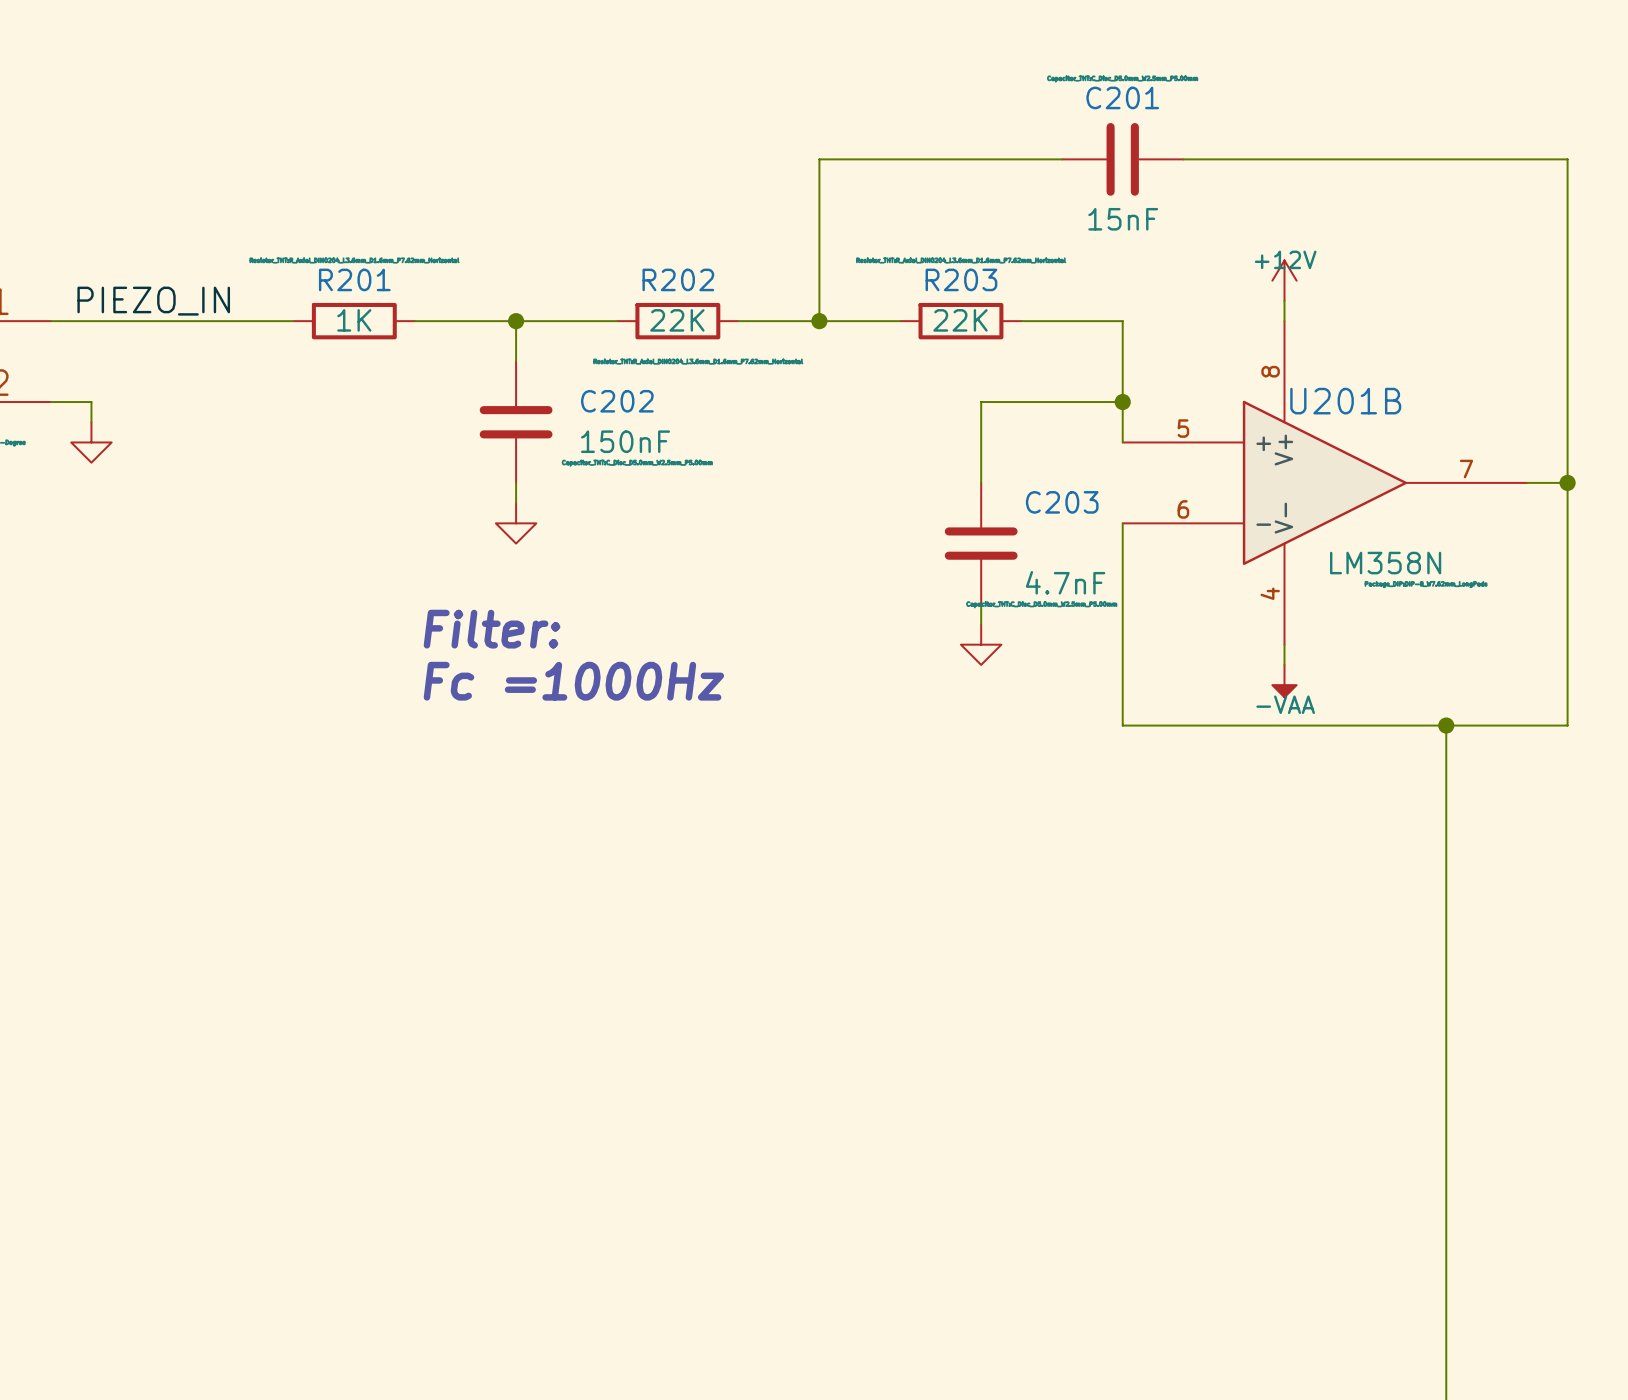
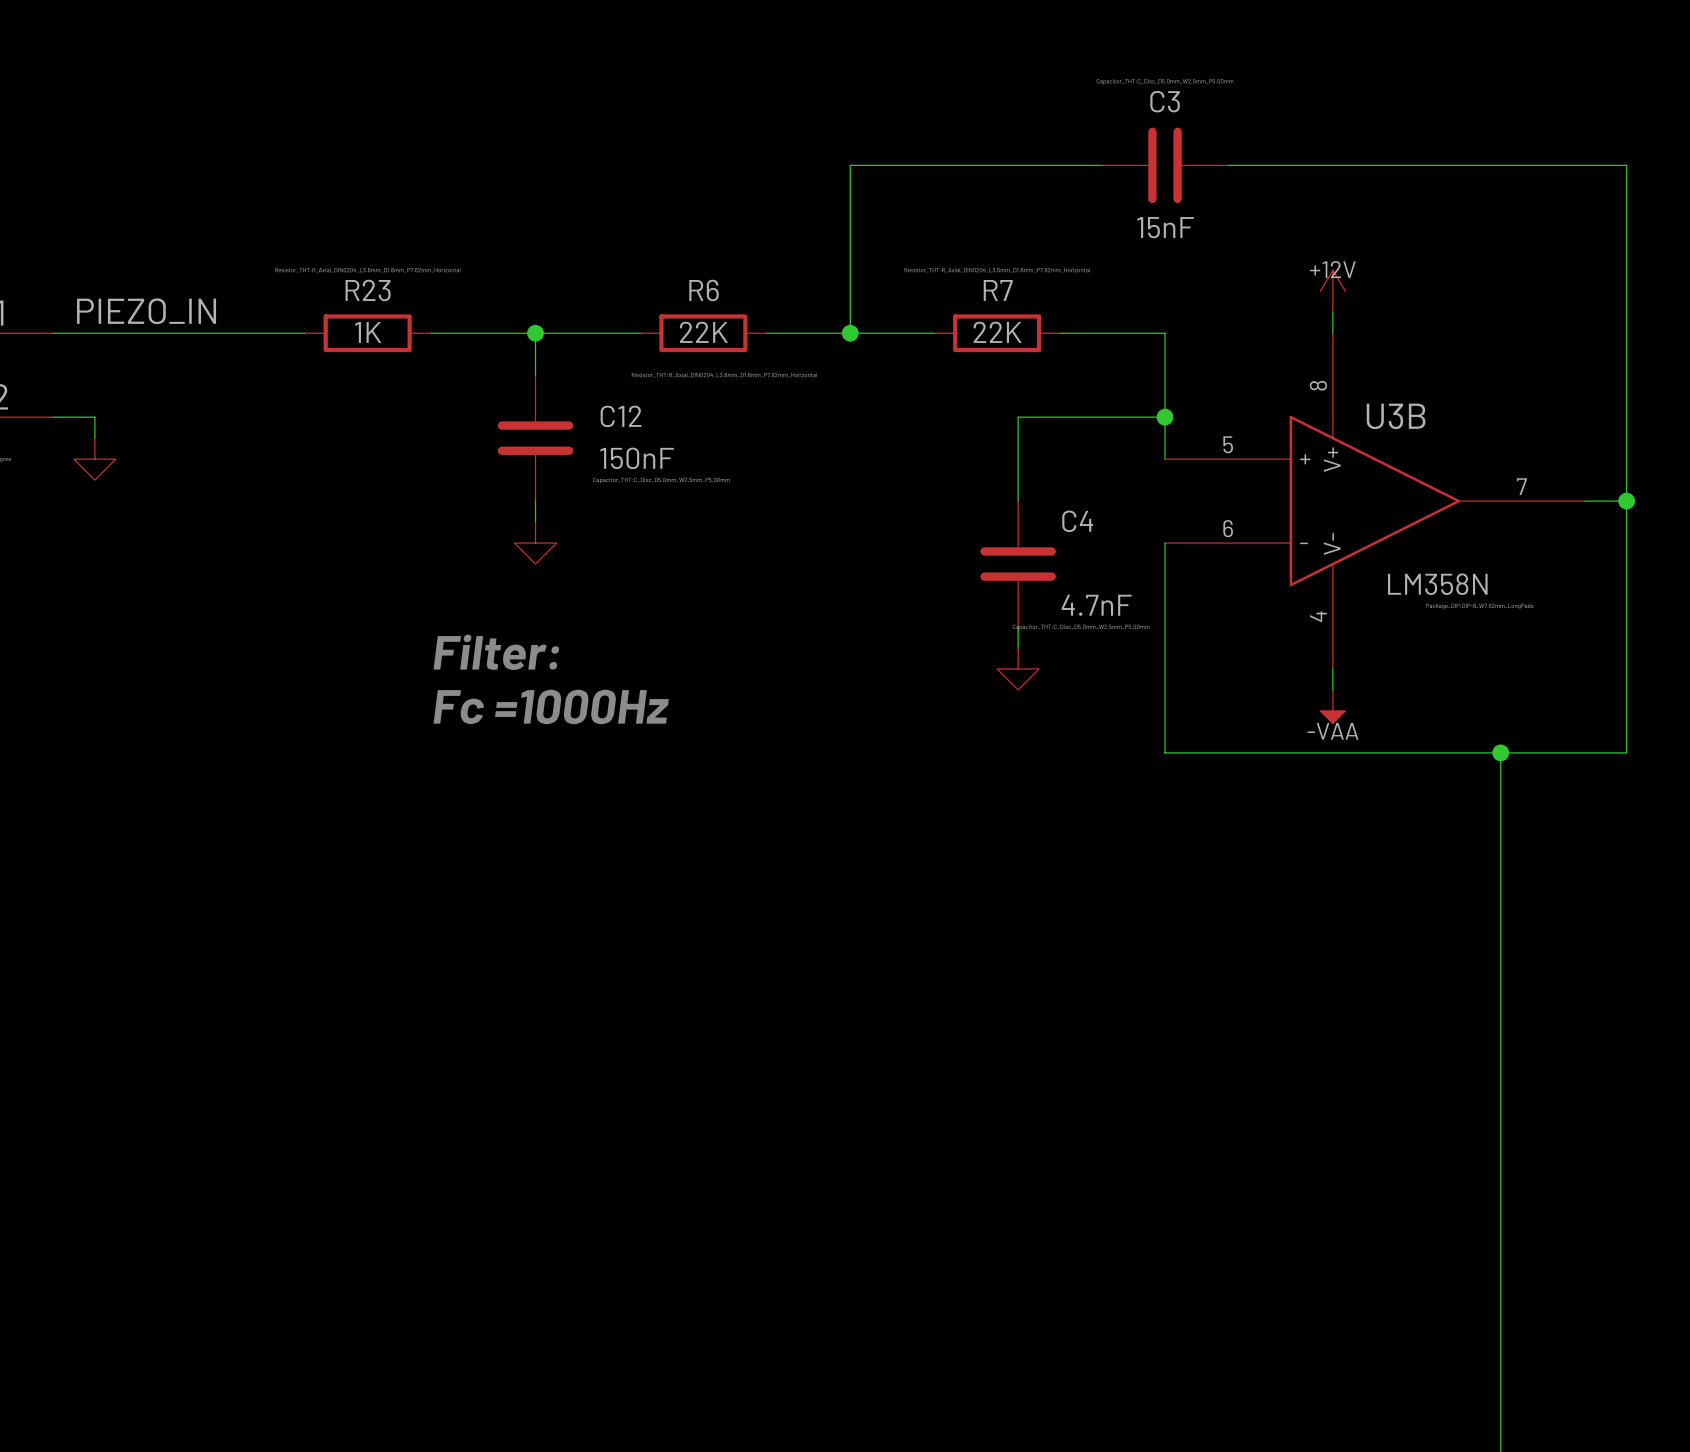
C201 name: C201 (1122, 97) -> C3 (1165, 101)
R201 name: R201 (354, 279) -> R23 (368, 290)
R202 name: R202 (678, 279) -> R6 (704, 290)
R203 name: R203 (961, 279) -> R7 (998, 290)
C202 name: C202 (617, 401) -> C12 (621, 416)
U201B name: U201B (1345, 401) -> U3B (1396, 416)
C203 name: C203 (1062, 502) -> C4 (1077, 521)

